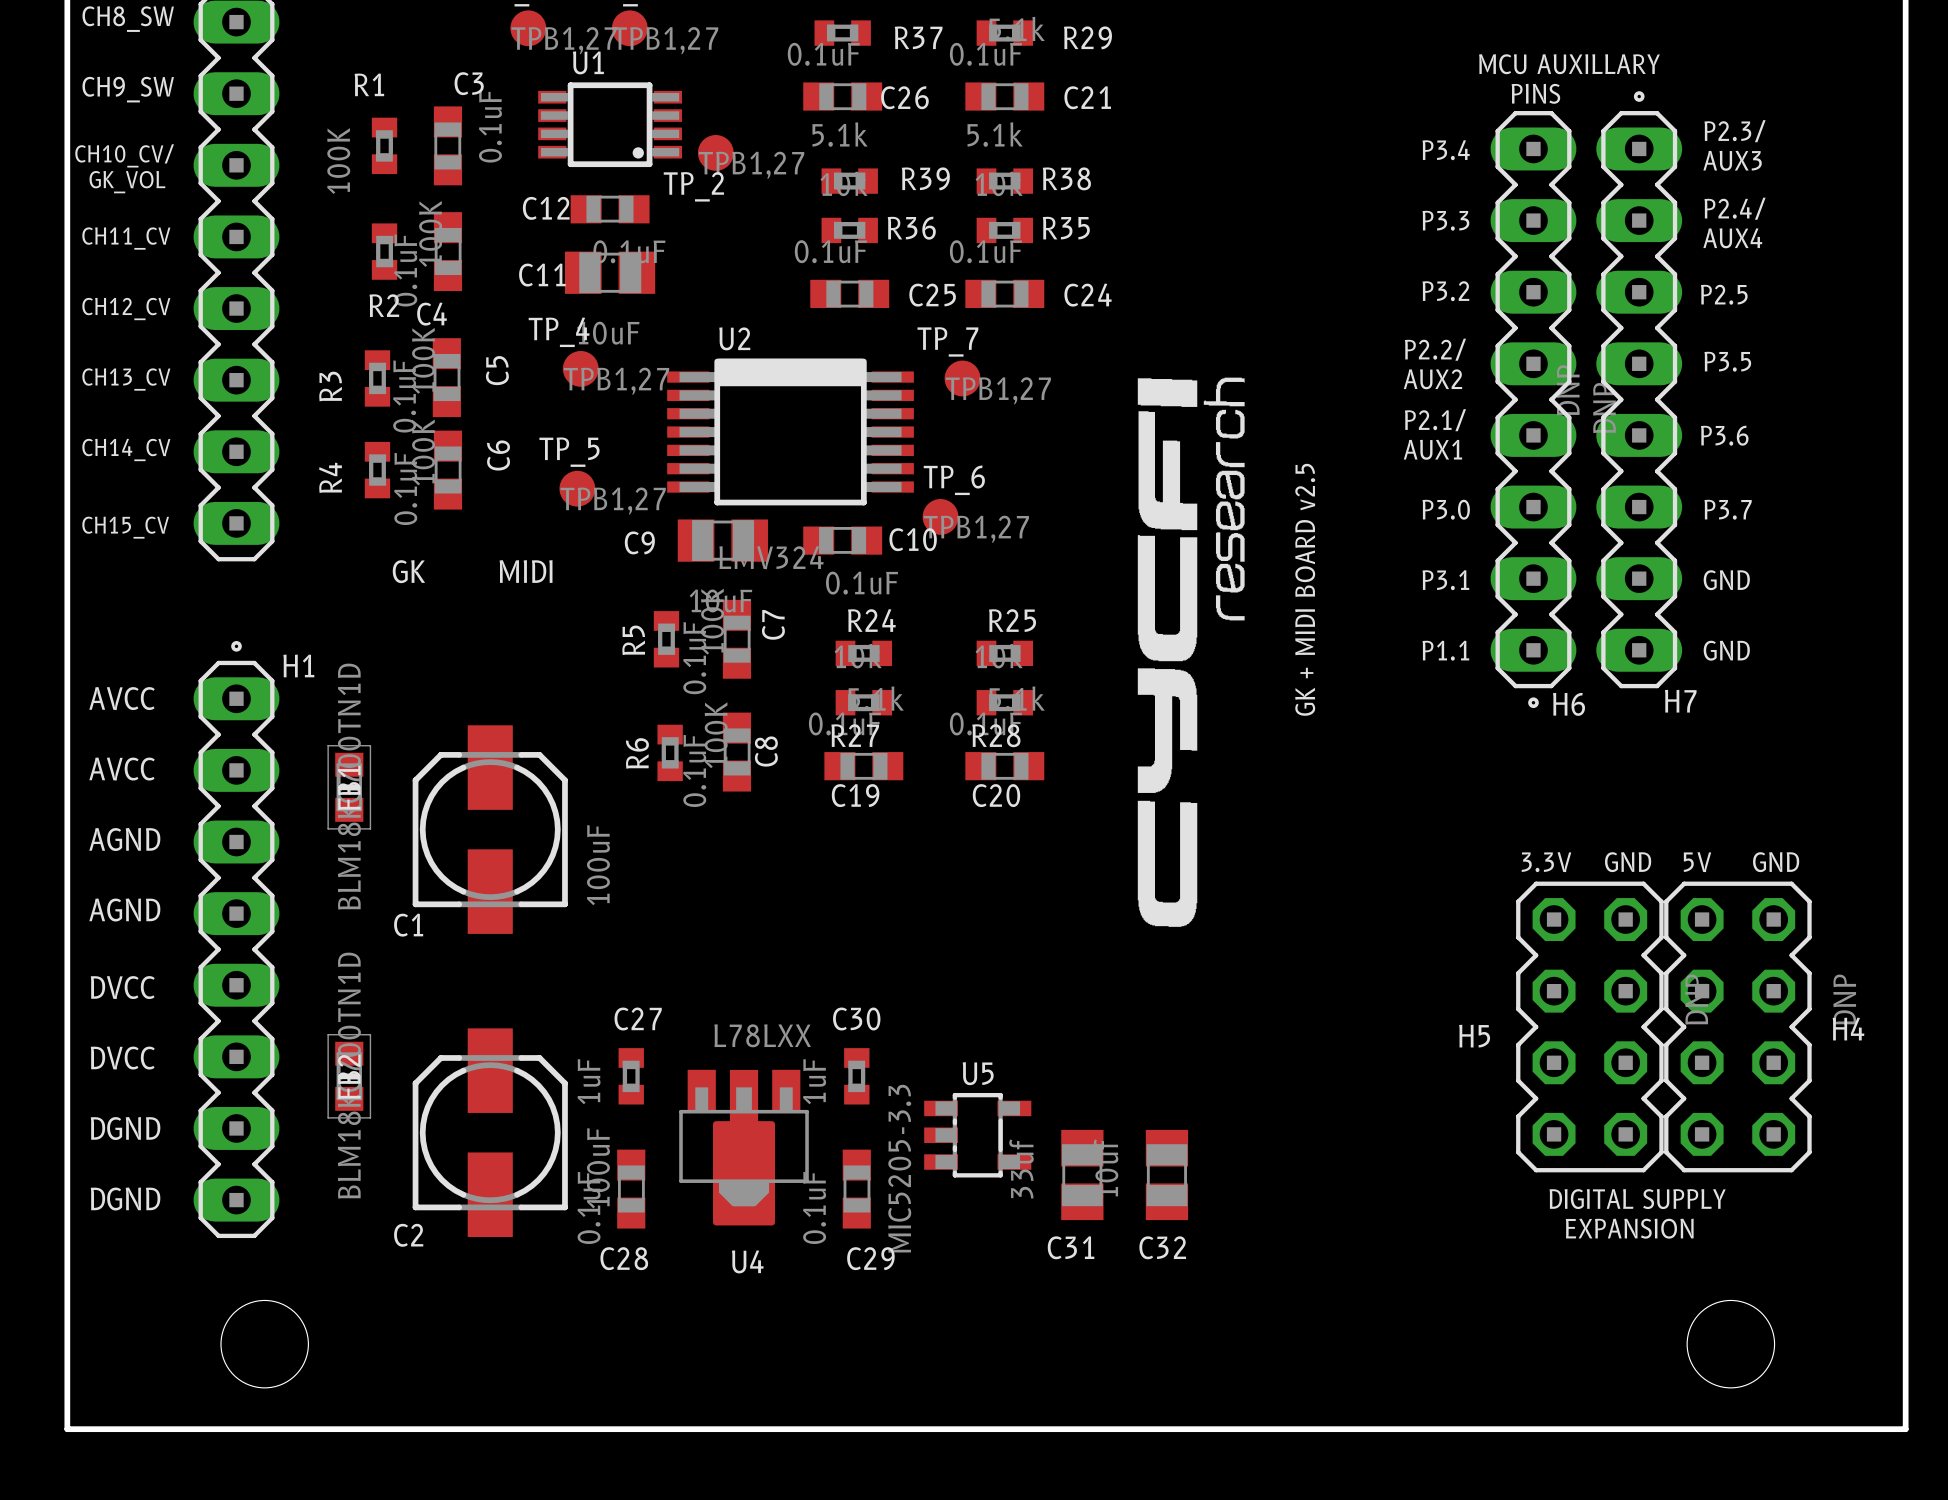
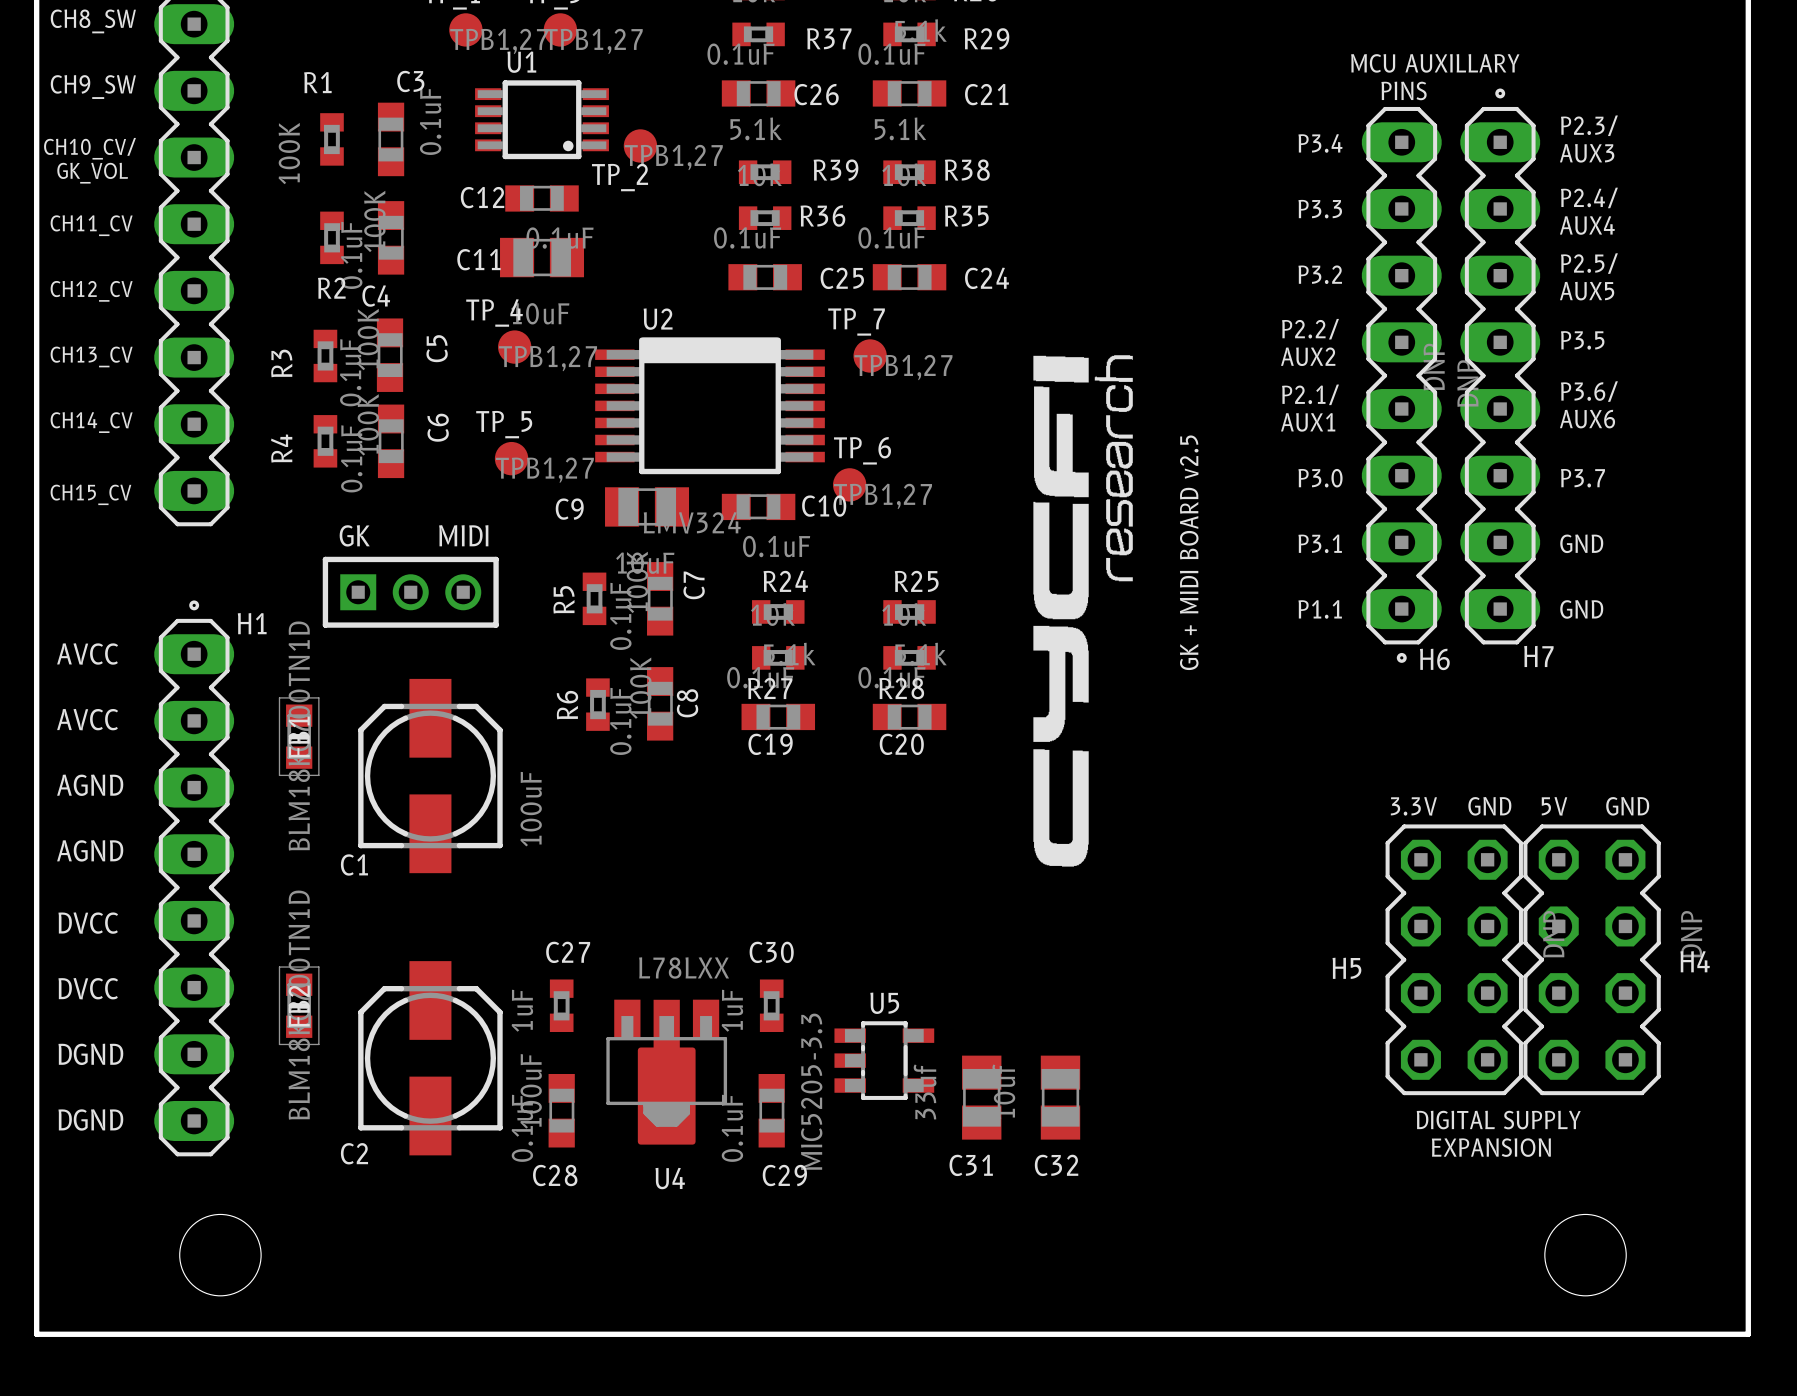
text: P2.5 (1724, 294) -> P2.5/ (1589, 263)
text: none -> AUX5 (1587, 291)
text: P3.6 (1724, 435) -> P3.6/ (1589, 391)
text: none -> AUX6 (1587, 419)
part: none -> (410, 592)

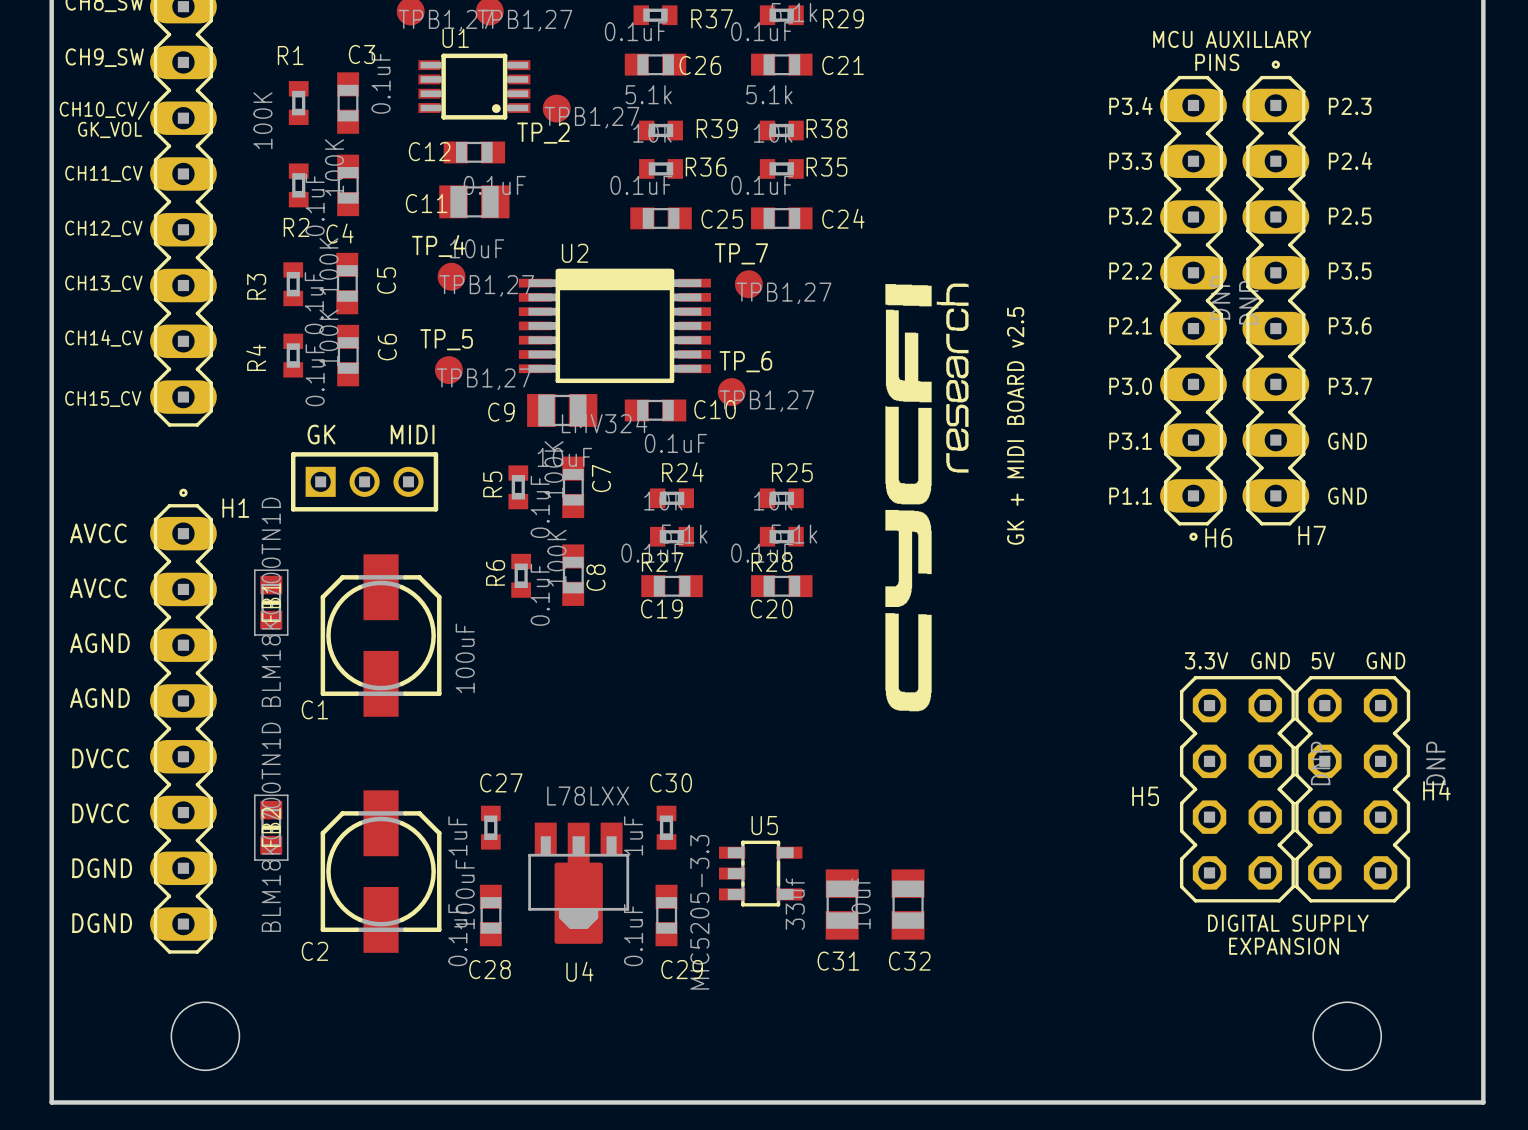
text: P2.3/ (1589, 125) -> P2.3 (1350, 106)
text: AUX3 (1587, 153) -> none
text: P2.4/ (1589, 197) -> P2.4 (1350, 160)
text: AUX4 (1587, 225) -> none
text: P2.5/ (1589, 263) -> P2.5 (1350, 216)
text: AUX5 (1587, 291) -> none
text: P2.2/ (1310, 329) -> P2.2 (1130, 271)
text: AUX2 (1308, 356) -> none
text: P3.6/ (1589, 391) -> P3.6 (1350, 325)
text: P2.1/ (1310, 394) -> P2.1 (1130, 325)
text: AUX6 (1587, 419) -> none
text: AUX1 (1308, 422) -> none

